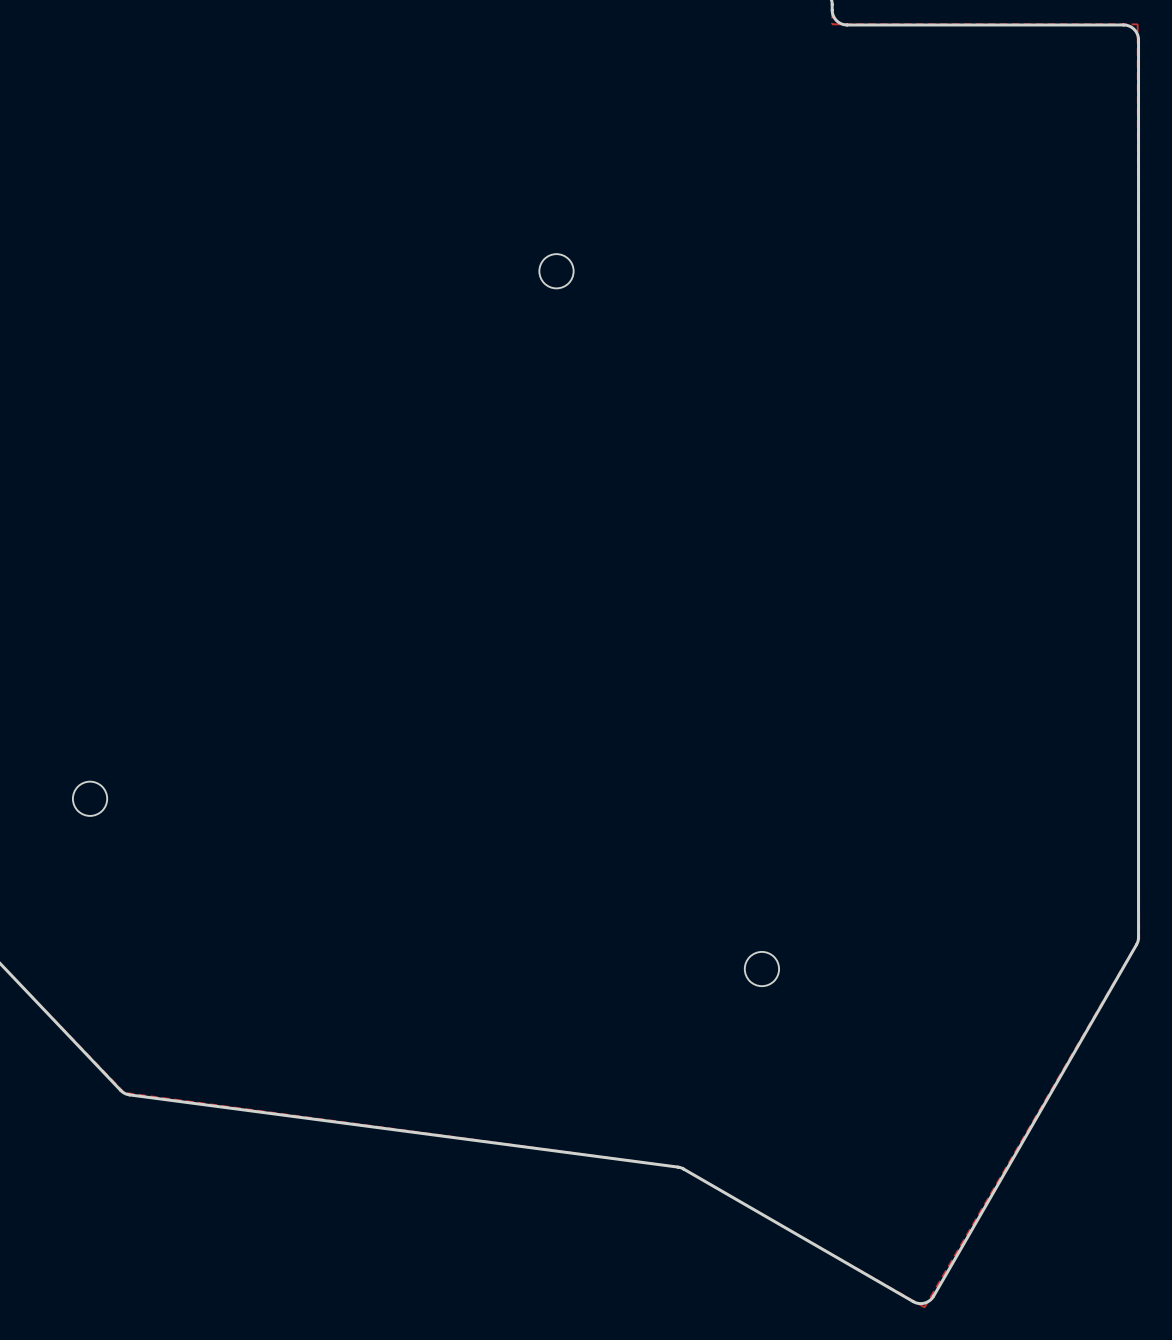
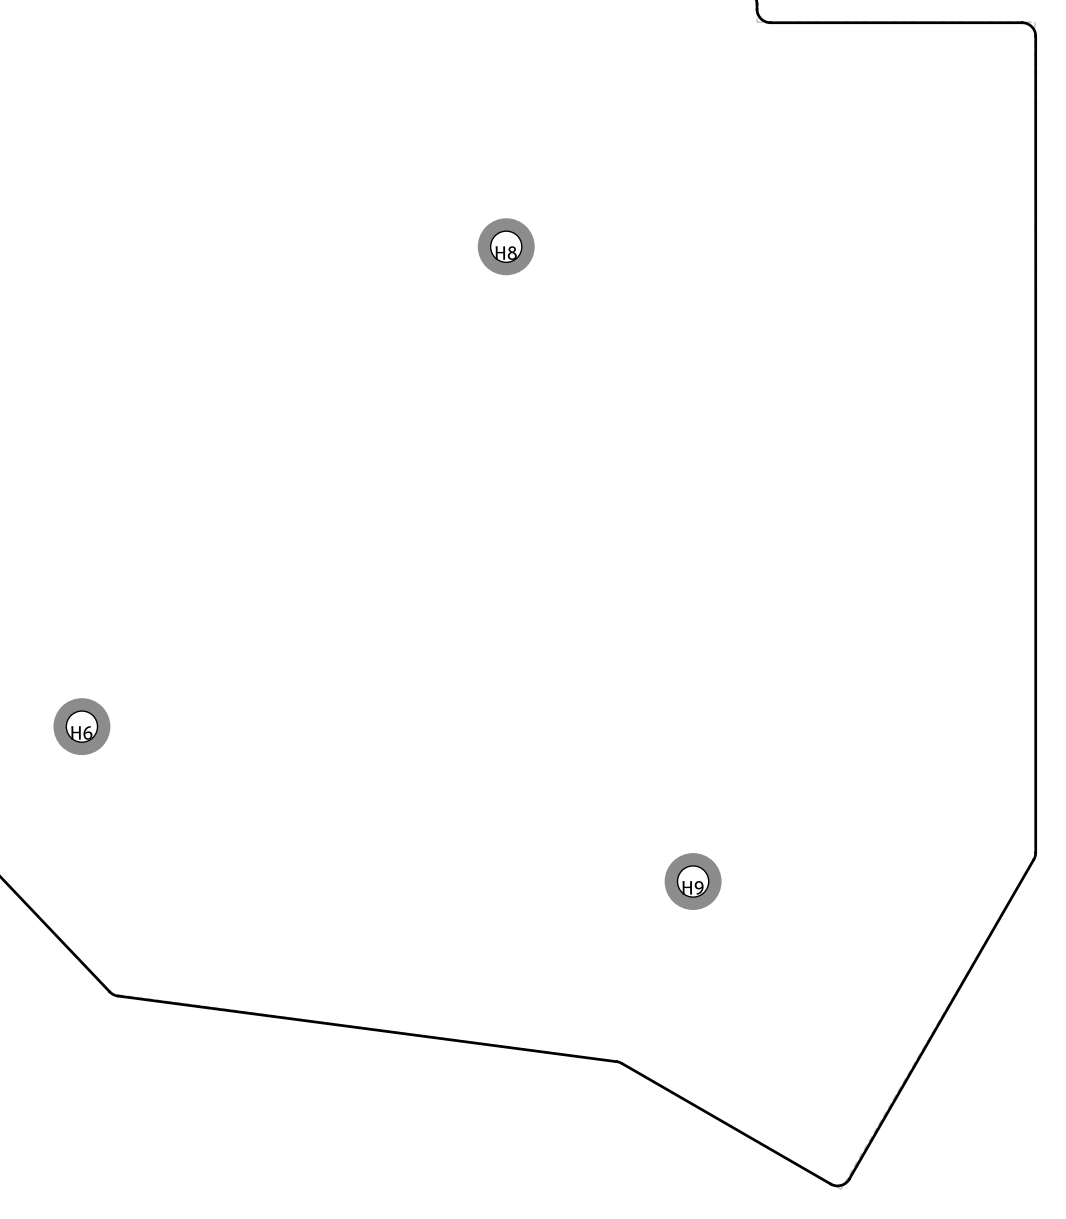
drawing: [538, 253, 575, 290] -> none
H8: none -> (506, 246)
drawing: [72, 780, 108, 817] -> none
H6: none -> (81, 726)
drawing: [744, 951, 780, 987] -> none
H9: none -> (693, 881)

